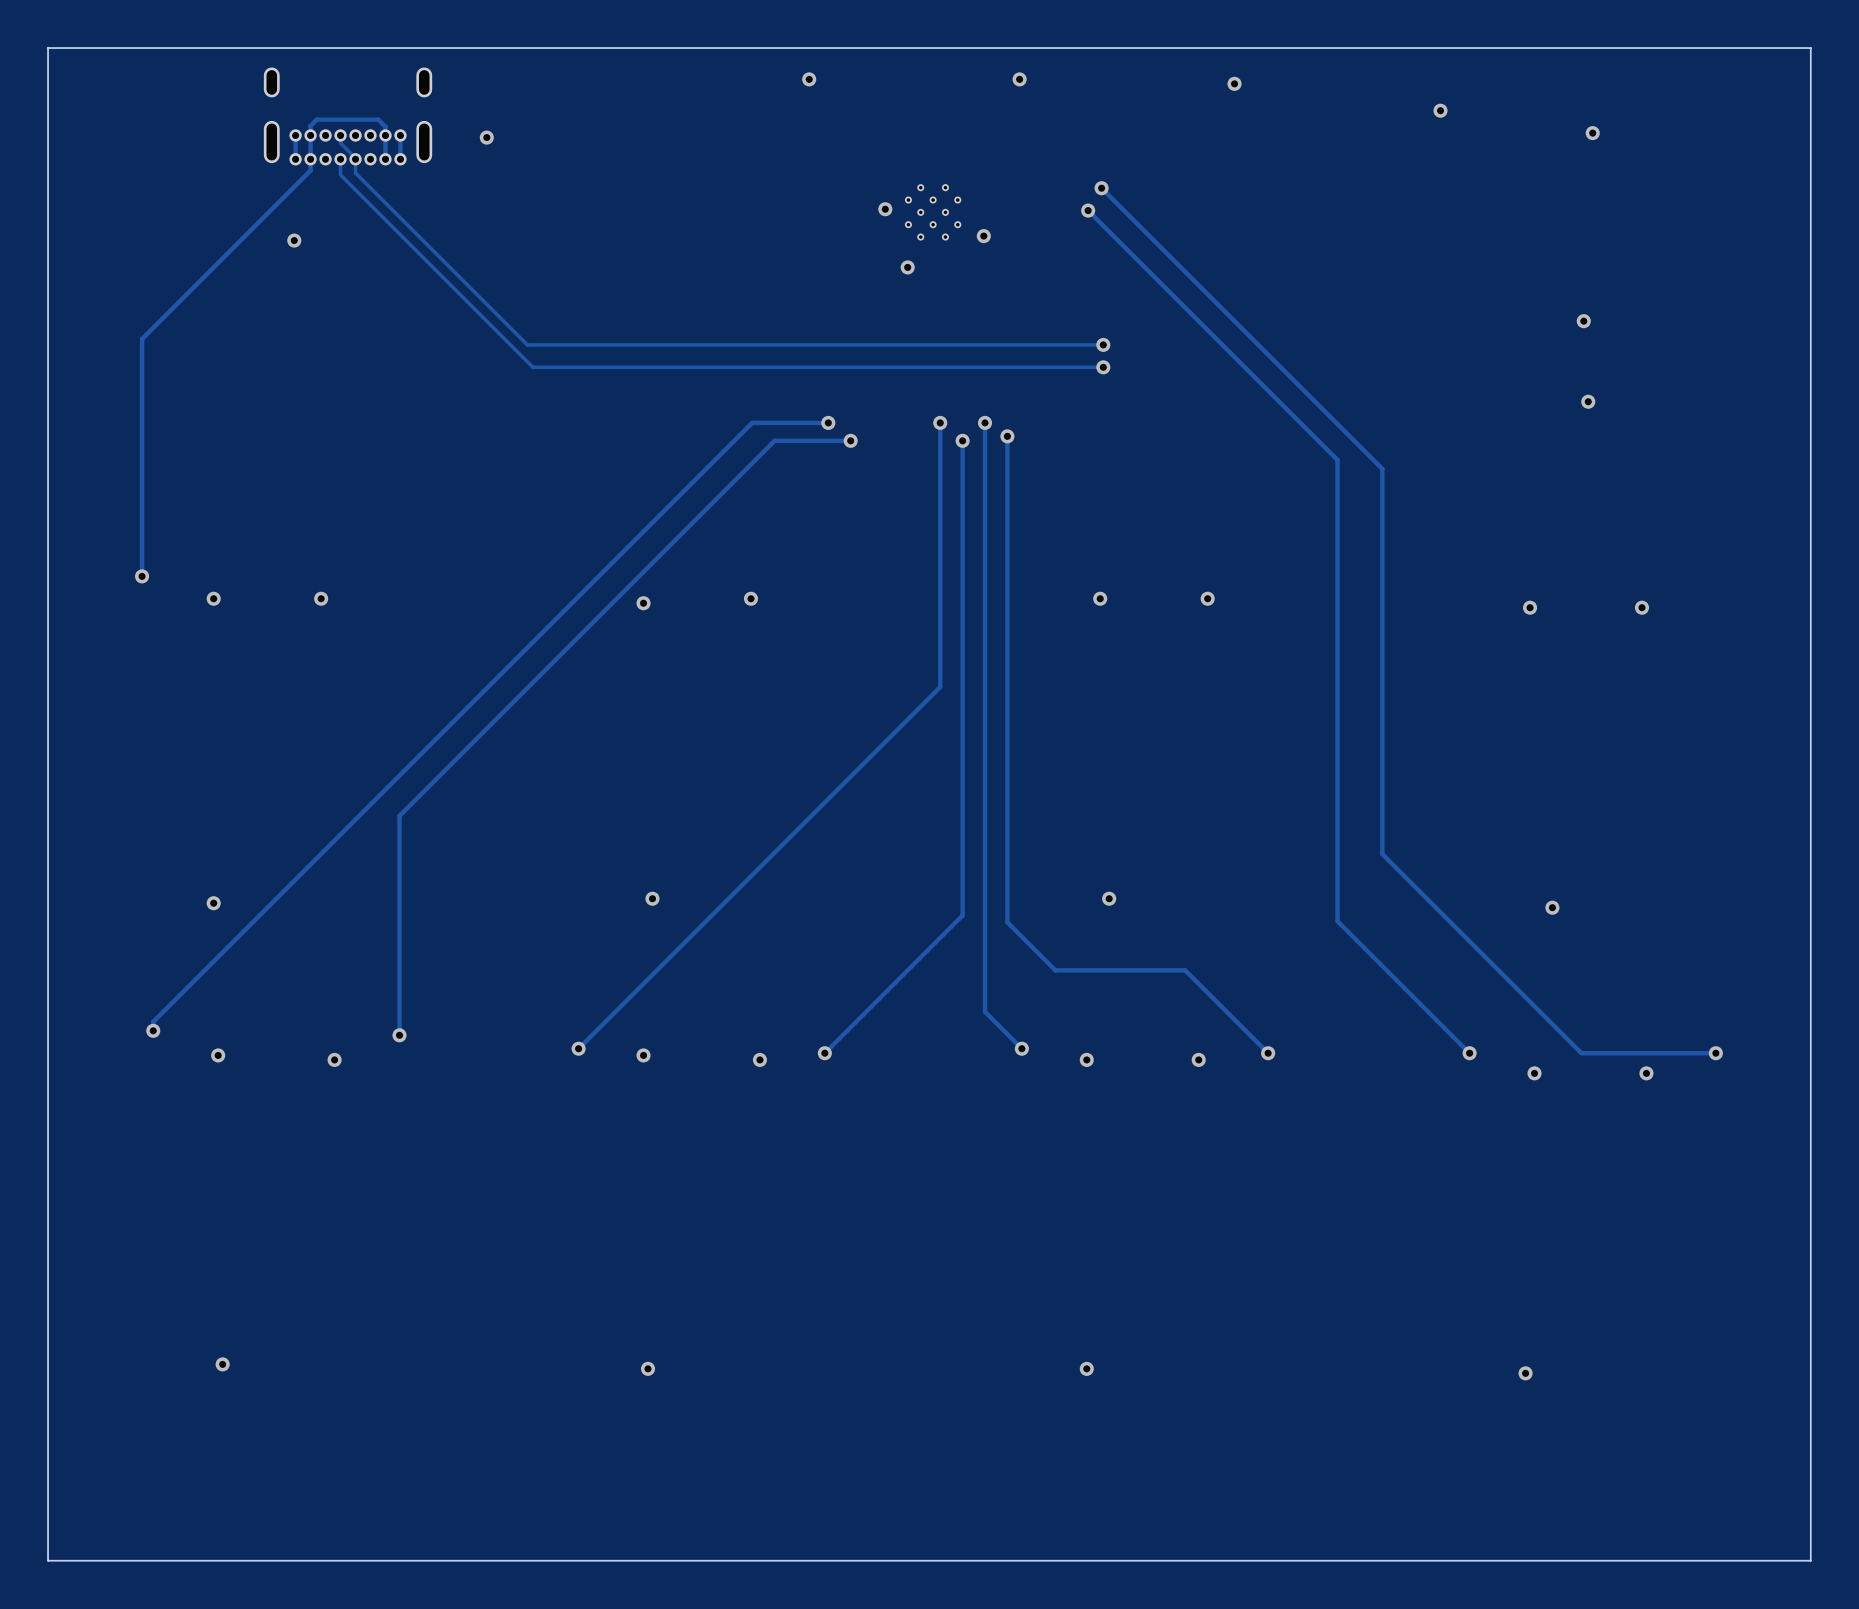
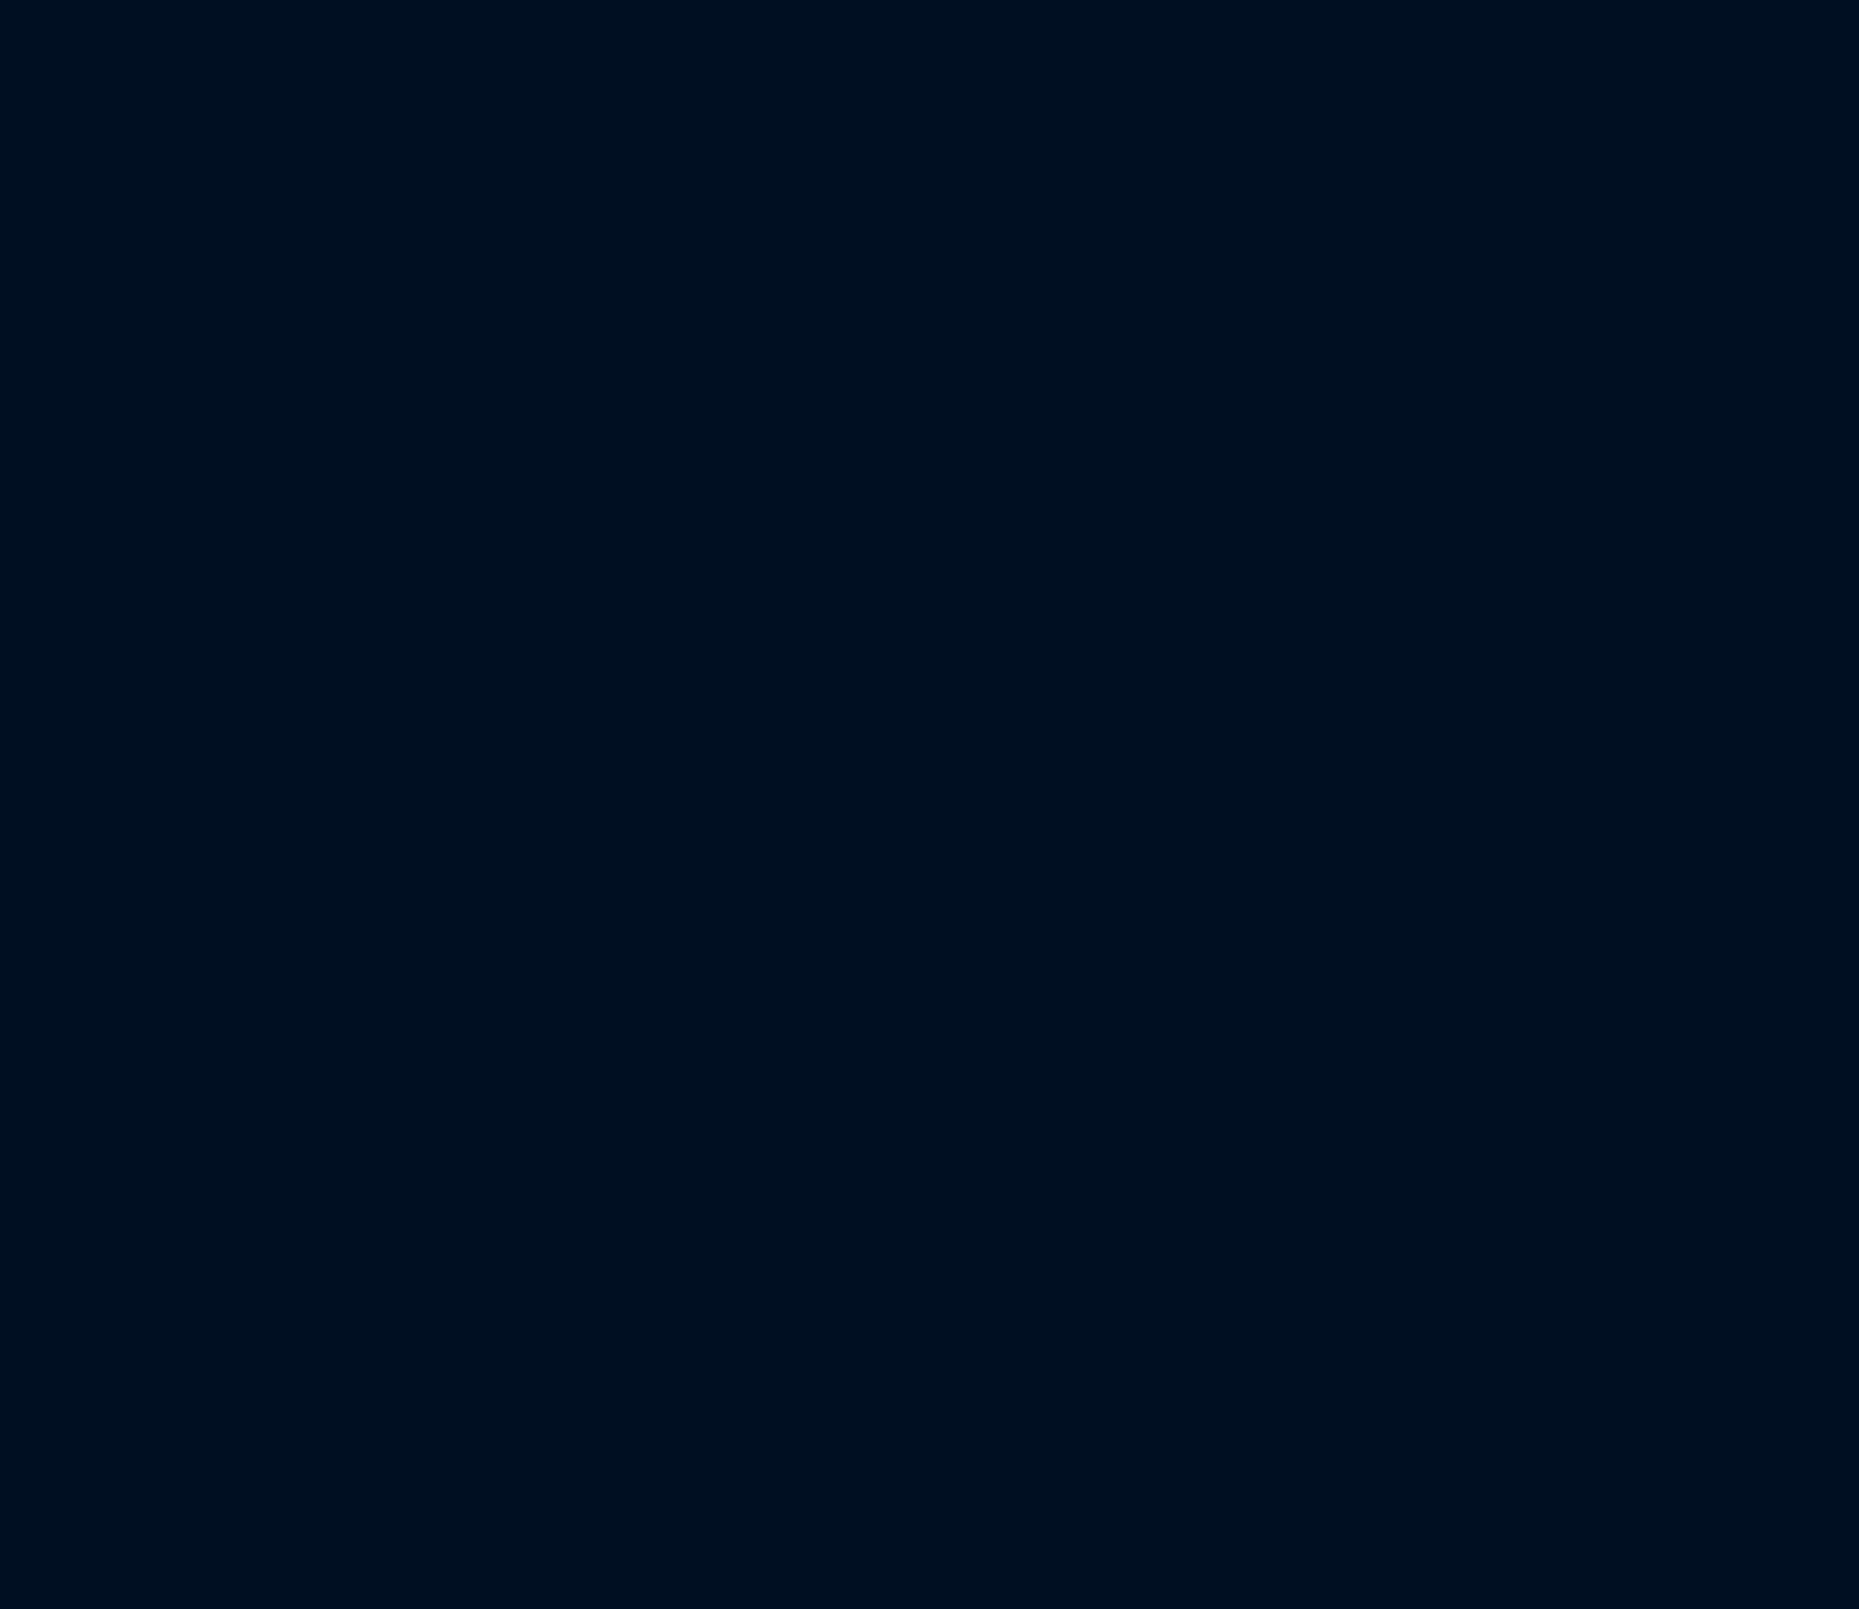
board edge: (1810, 48) (48, 48) (48, 1560) (1810, 1560) (1810, 48) -> none
via: (809, 79) -> none
via: (1019, 79) -> none
via: (1234, 83) -> none
via: (1440, 110) -> none
part: (348, 116) -> none
via: (1592, 133) -> none
track: (295, 135) (295, 159) -> none
track: (340, 135) (340, 143) (355, 158) (355, 173) (527, 344) (1103, 344) -> none
track: (400, 135) (400, 159) -> none
via: (486, 137) -> none
track: (340, 159) (340, 174) (532, 367) (1103, 367) -> none
track: (385, 159) (385, 126) (378, 119) (316, 119) (310, 125) (310, 170) (142, 339) (142, 576) -> none
track: (1101, 188) (1382, 468) (1382, 853) (1581, 1053) (1715, 1053) -> none
via: (1101, 188) -> none
via: (885, 209) -> none
track: (1088, 210) (1337, 459) (1337, 921) (1469, 1053) -> none
via: (1088, 210) -> none
part: (933, 212) -> none
via: (983, 236) -> none
via: (294, 240) -> none
via: (907, 267) -> none
via: (1583, 321) -> none
via: (1103, 344) -> none
via: (1103, 367) -> none
via: (1588, 401) -> none
track: (828, 422) (752, 422) (153, 1021) (153, 1030) -> none
via: (828, 422) -> none
track: (940, 422) (940, 687) (578, 1048) -> none
via: (940, 422) -> none
track: (985, 422) (985, 1011) (1021, 1048) -> none
via: (985, 422) -> none
track: (1007, 436) (1007, 922) (1055, 970) (1185, 970) (1268, 1053) -> none
via: (1007, 436) -> none
track: (850, 440) (774, 440) (399, 815) (399, 1035) -> none
via: (850, 440) -> none
track: (962, 440) (962, 915) (824, 1053) -> none
via: (962, 440) -> none
via: (142, 576) -> none
via: (213, 598) -> none
via: (321, 598) -> none
via: (750, 598) -> none
via: (1100, 598) -> none
via: (1207, 598) -> none
via: (643, 603) -> none
via: (1530, 607) -> none
via: (1641, 607) -> none
via: (652, 898) -> none
via: (1109, 898) -> none
via: (213, 903) -> none
via: (1552, 907) -> none
via: (153, 1030) -> none
via: (399, 1035) -> none
via: (578, 1048) -> none
via: (1021, 1048) -> none
via: (824, 1053) -> none
via: (1268, 1053) -> none
via: (1469, 1053) -> none
via: (1715, 1053) -> none
via: (218, 1055) -> none
via: (643, 1055) -> none
via: (334, 1059) -> none
via: (759, 1059) -> none
via: (1086, 1059) -> none
via: (1198, 1059) -> none
via: (1534, 1073) -> none
via: (1646, 1073) -> none
via: (222, 1364) -> none
via: (648, 1368) -> none
via: (1086, 1368) -> none
via: (1525, 1373) -> none

